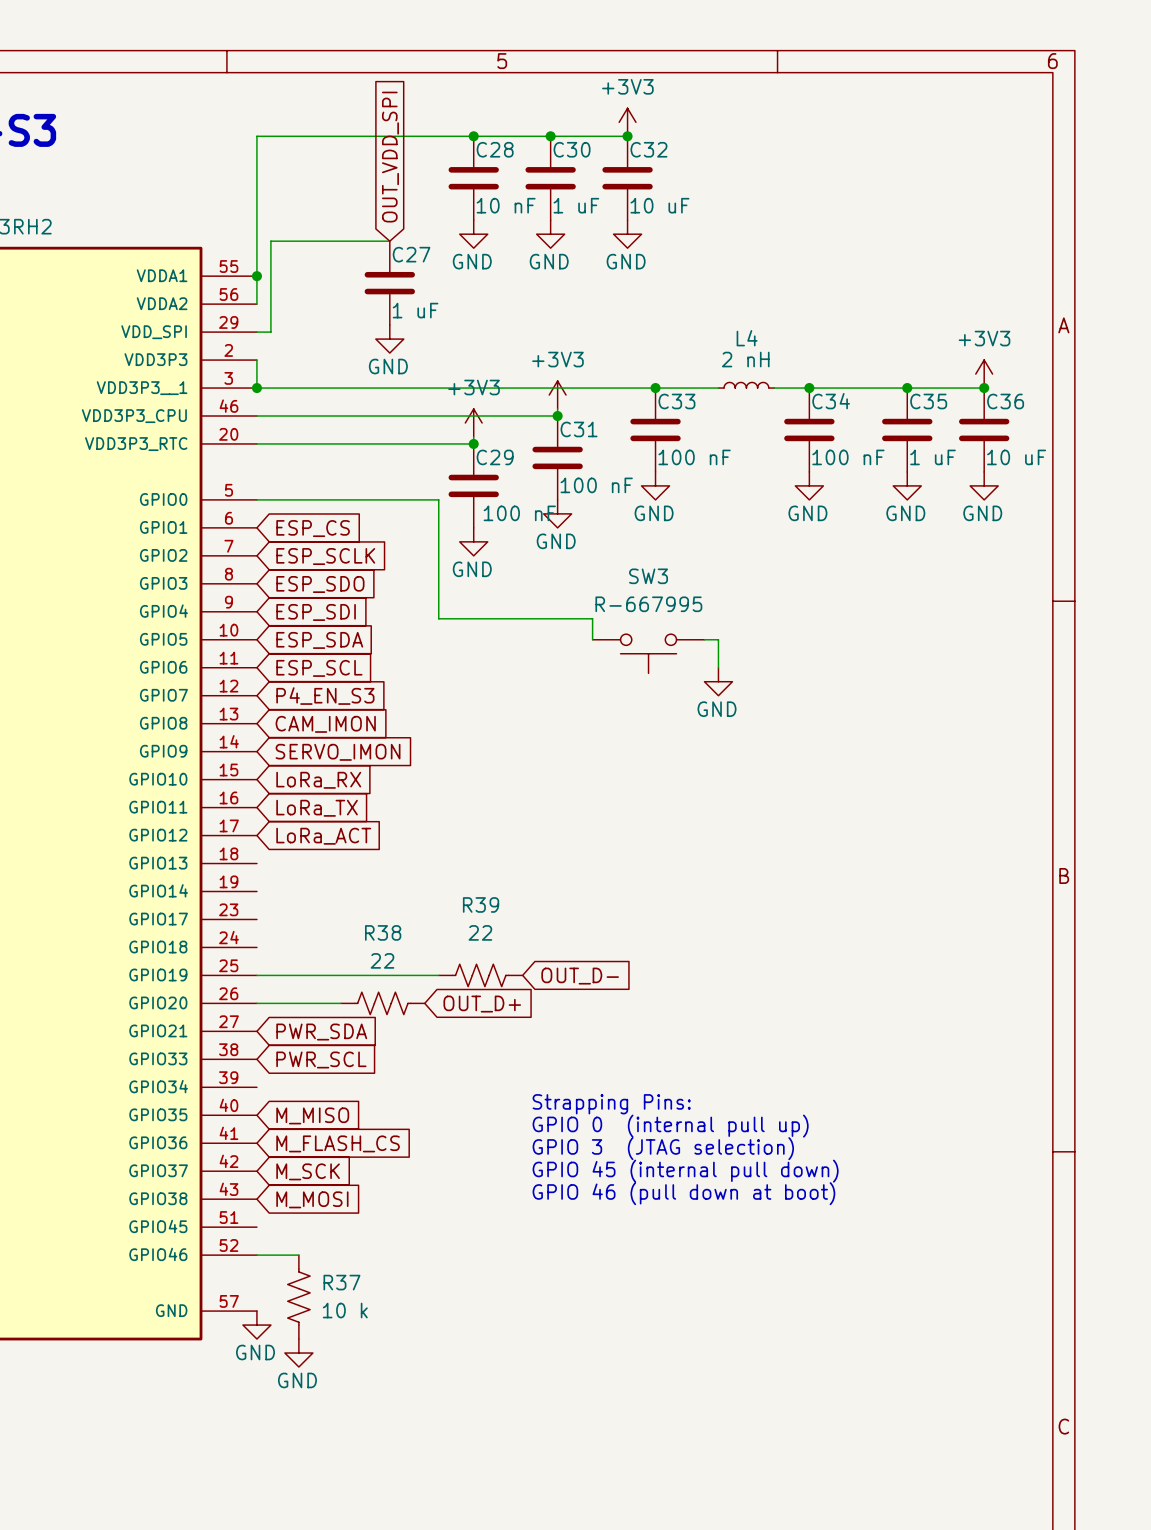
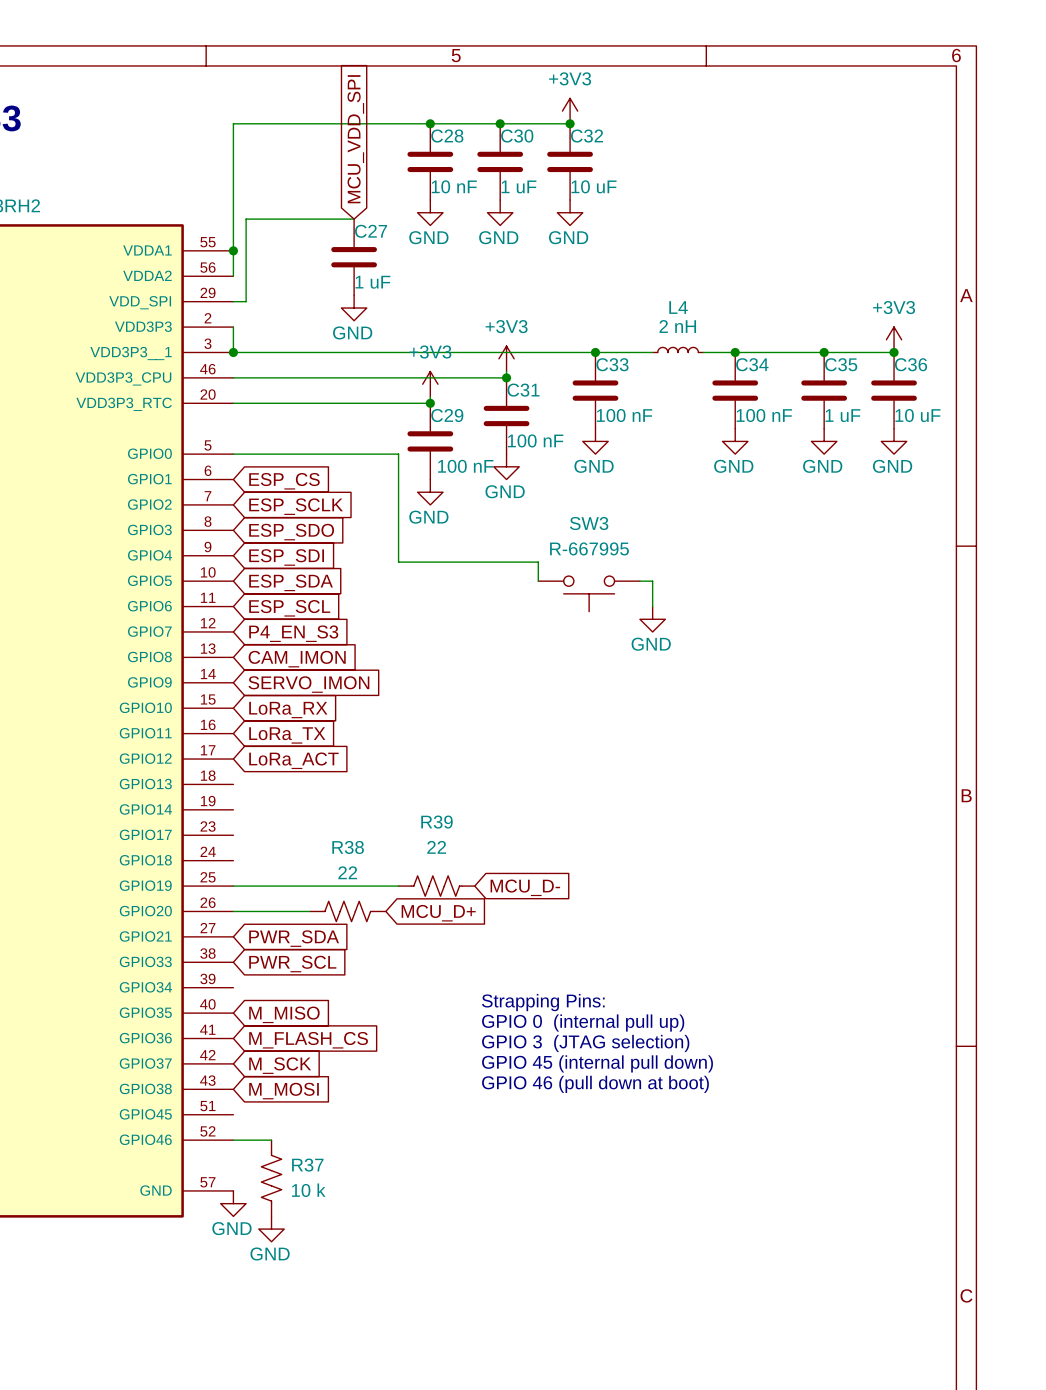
global label: OUT_VDD_SPI (390, 157) -> MCU_VDD_SPI (355, 139)
global label: OUT_D- (580, 976) -> MCU_D- (525, 887)
global label: OUT_D+ (482, 1004) -> MCU_D+ (438, 913)

